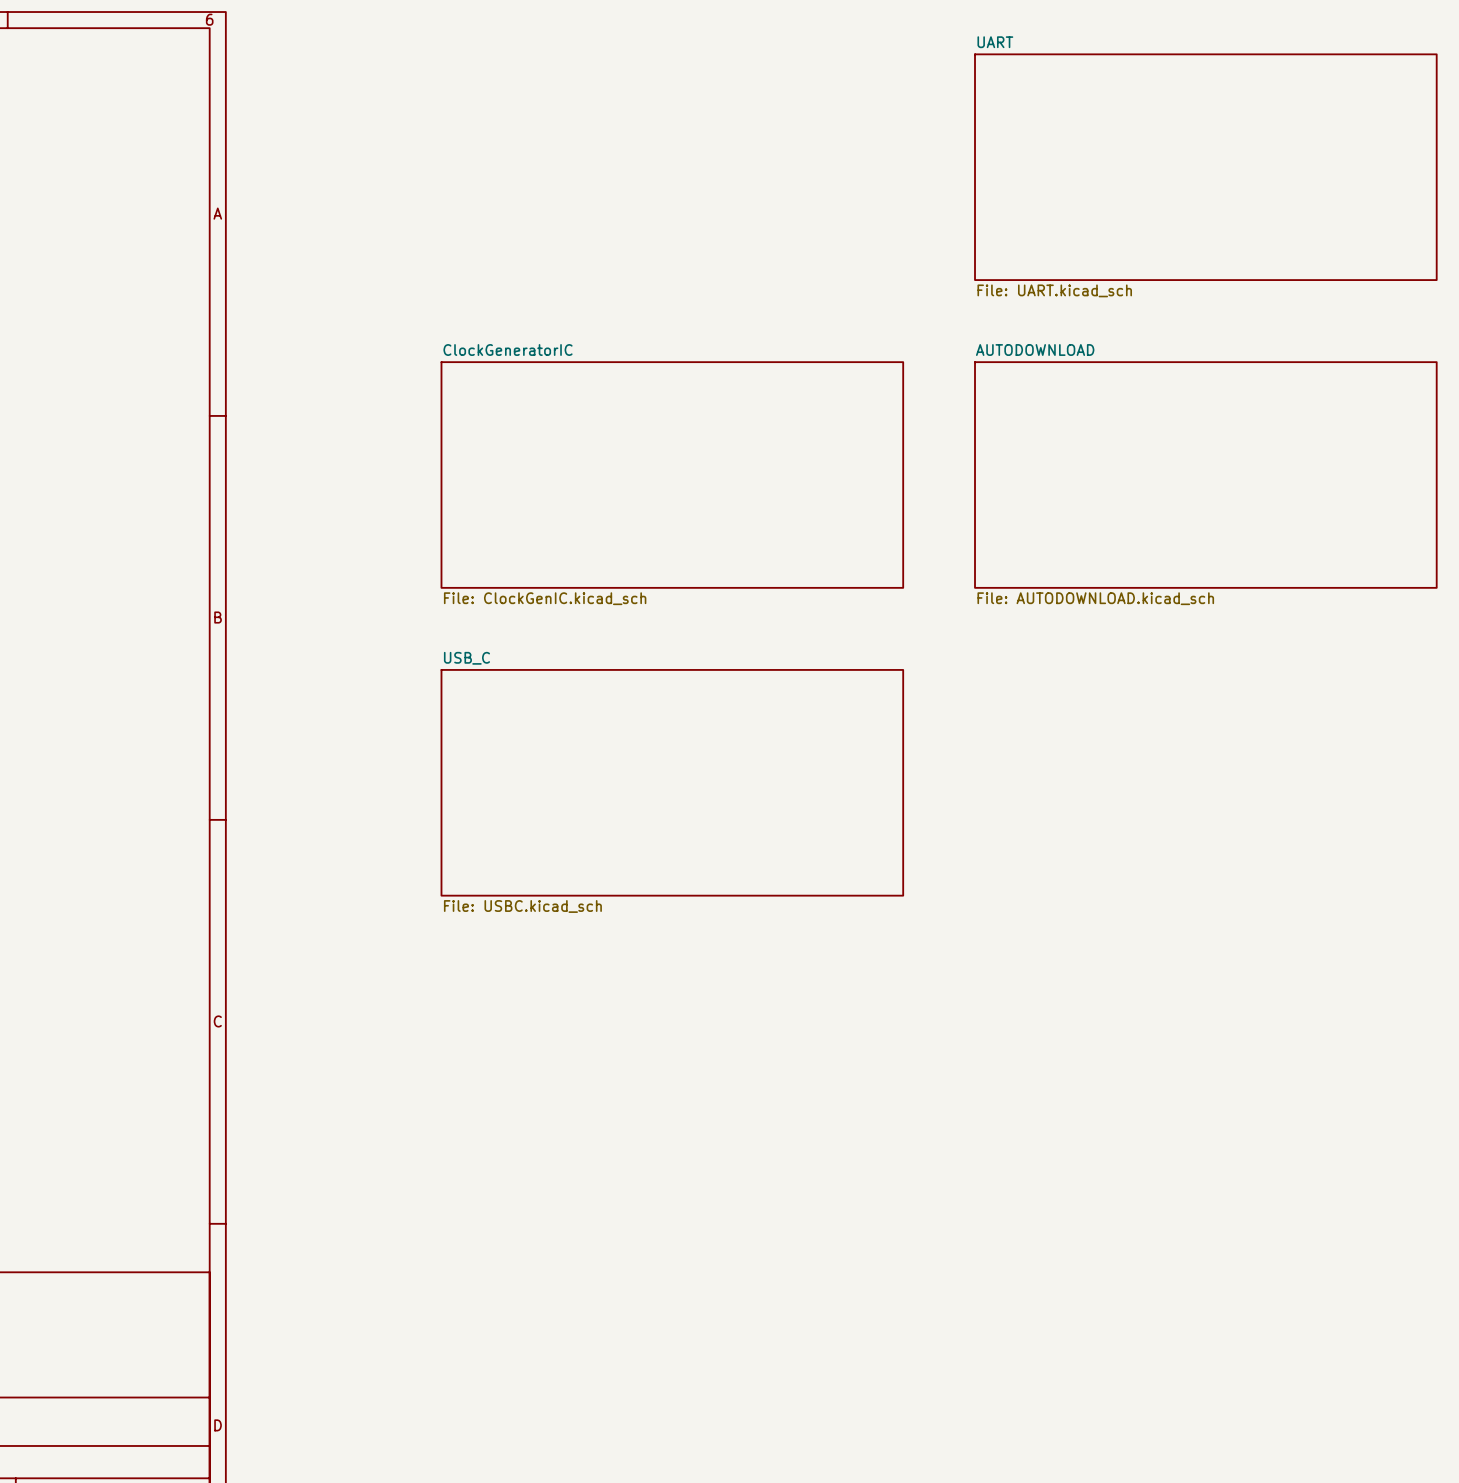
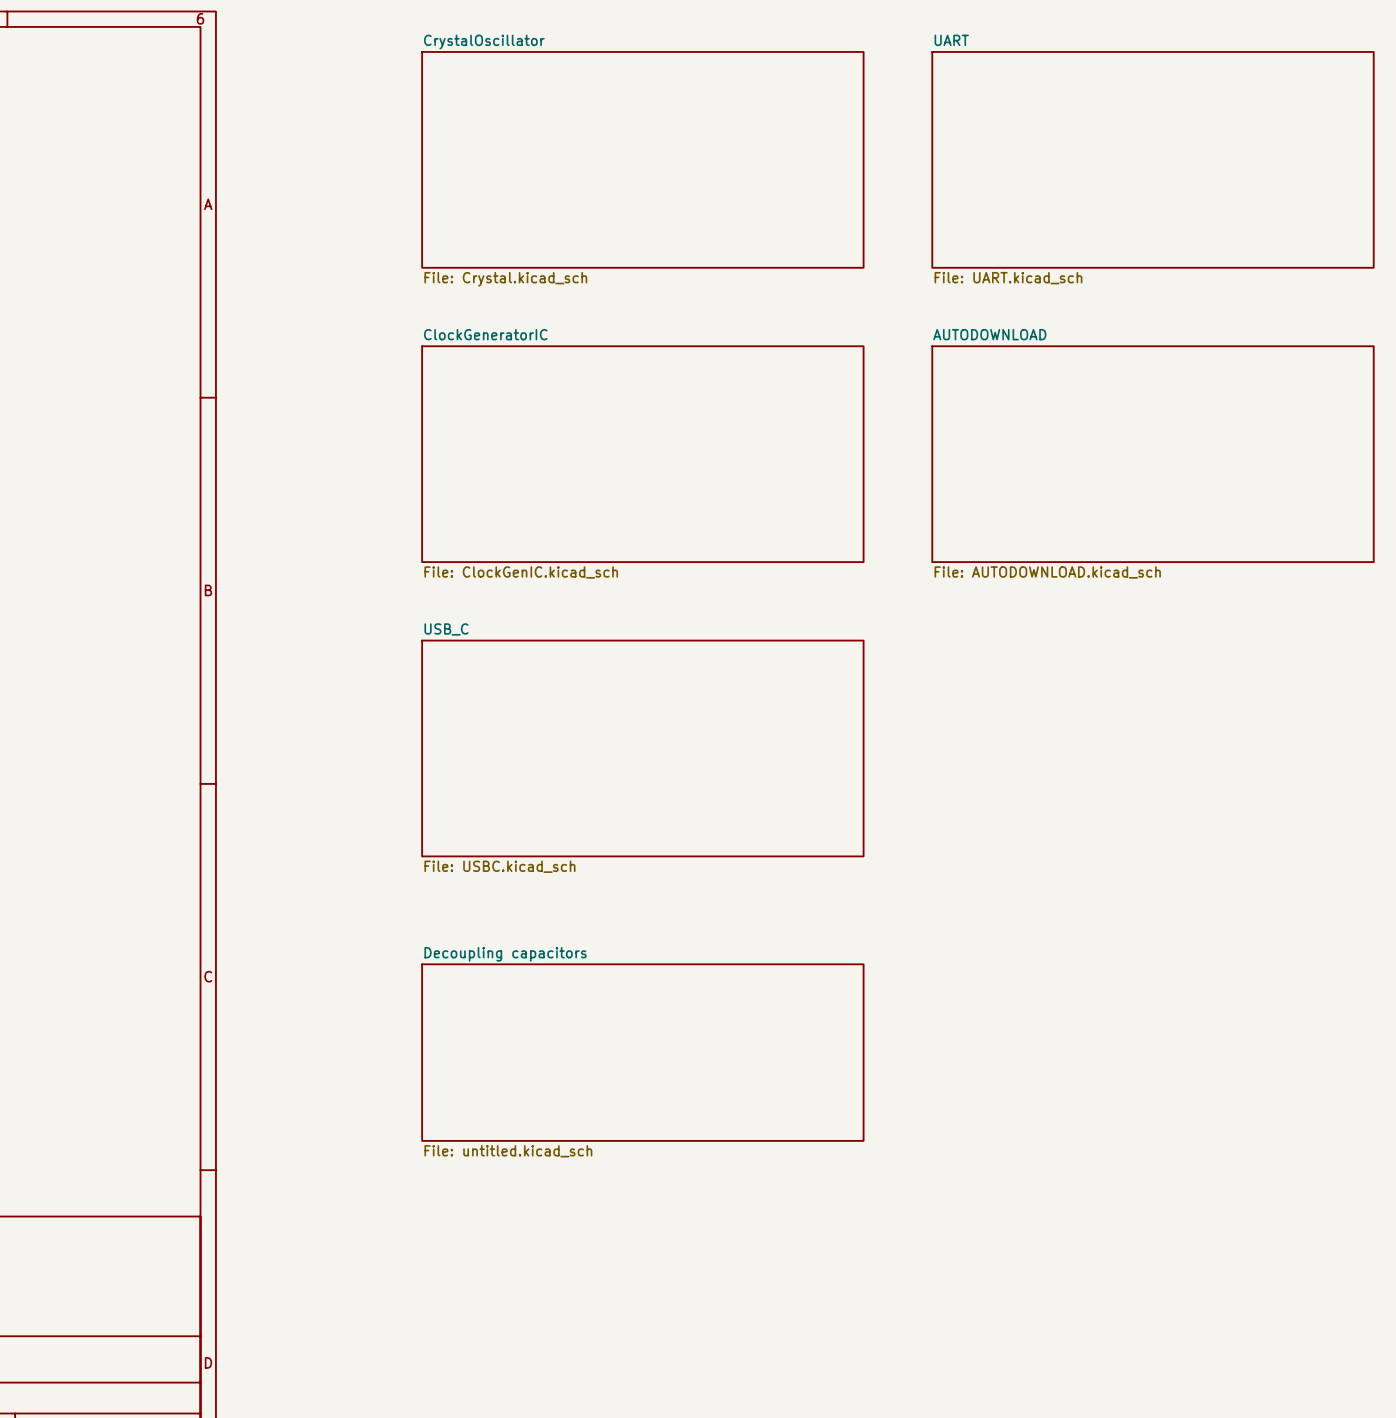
sheet CrystalOscillator: none -> File: Crystal.kicad_sch (642, 159)
sheet Decoupling capacitors: none -> File: untitled.kicad_sch (642, 1052)

